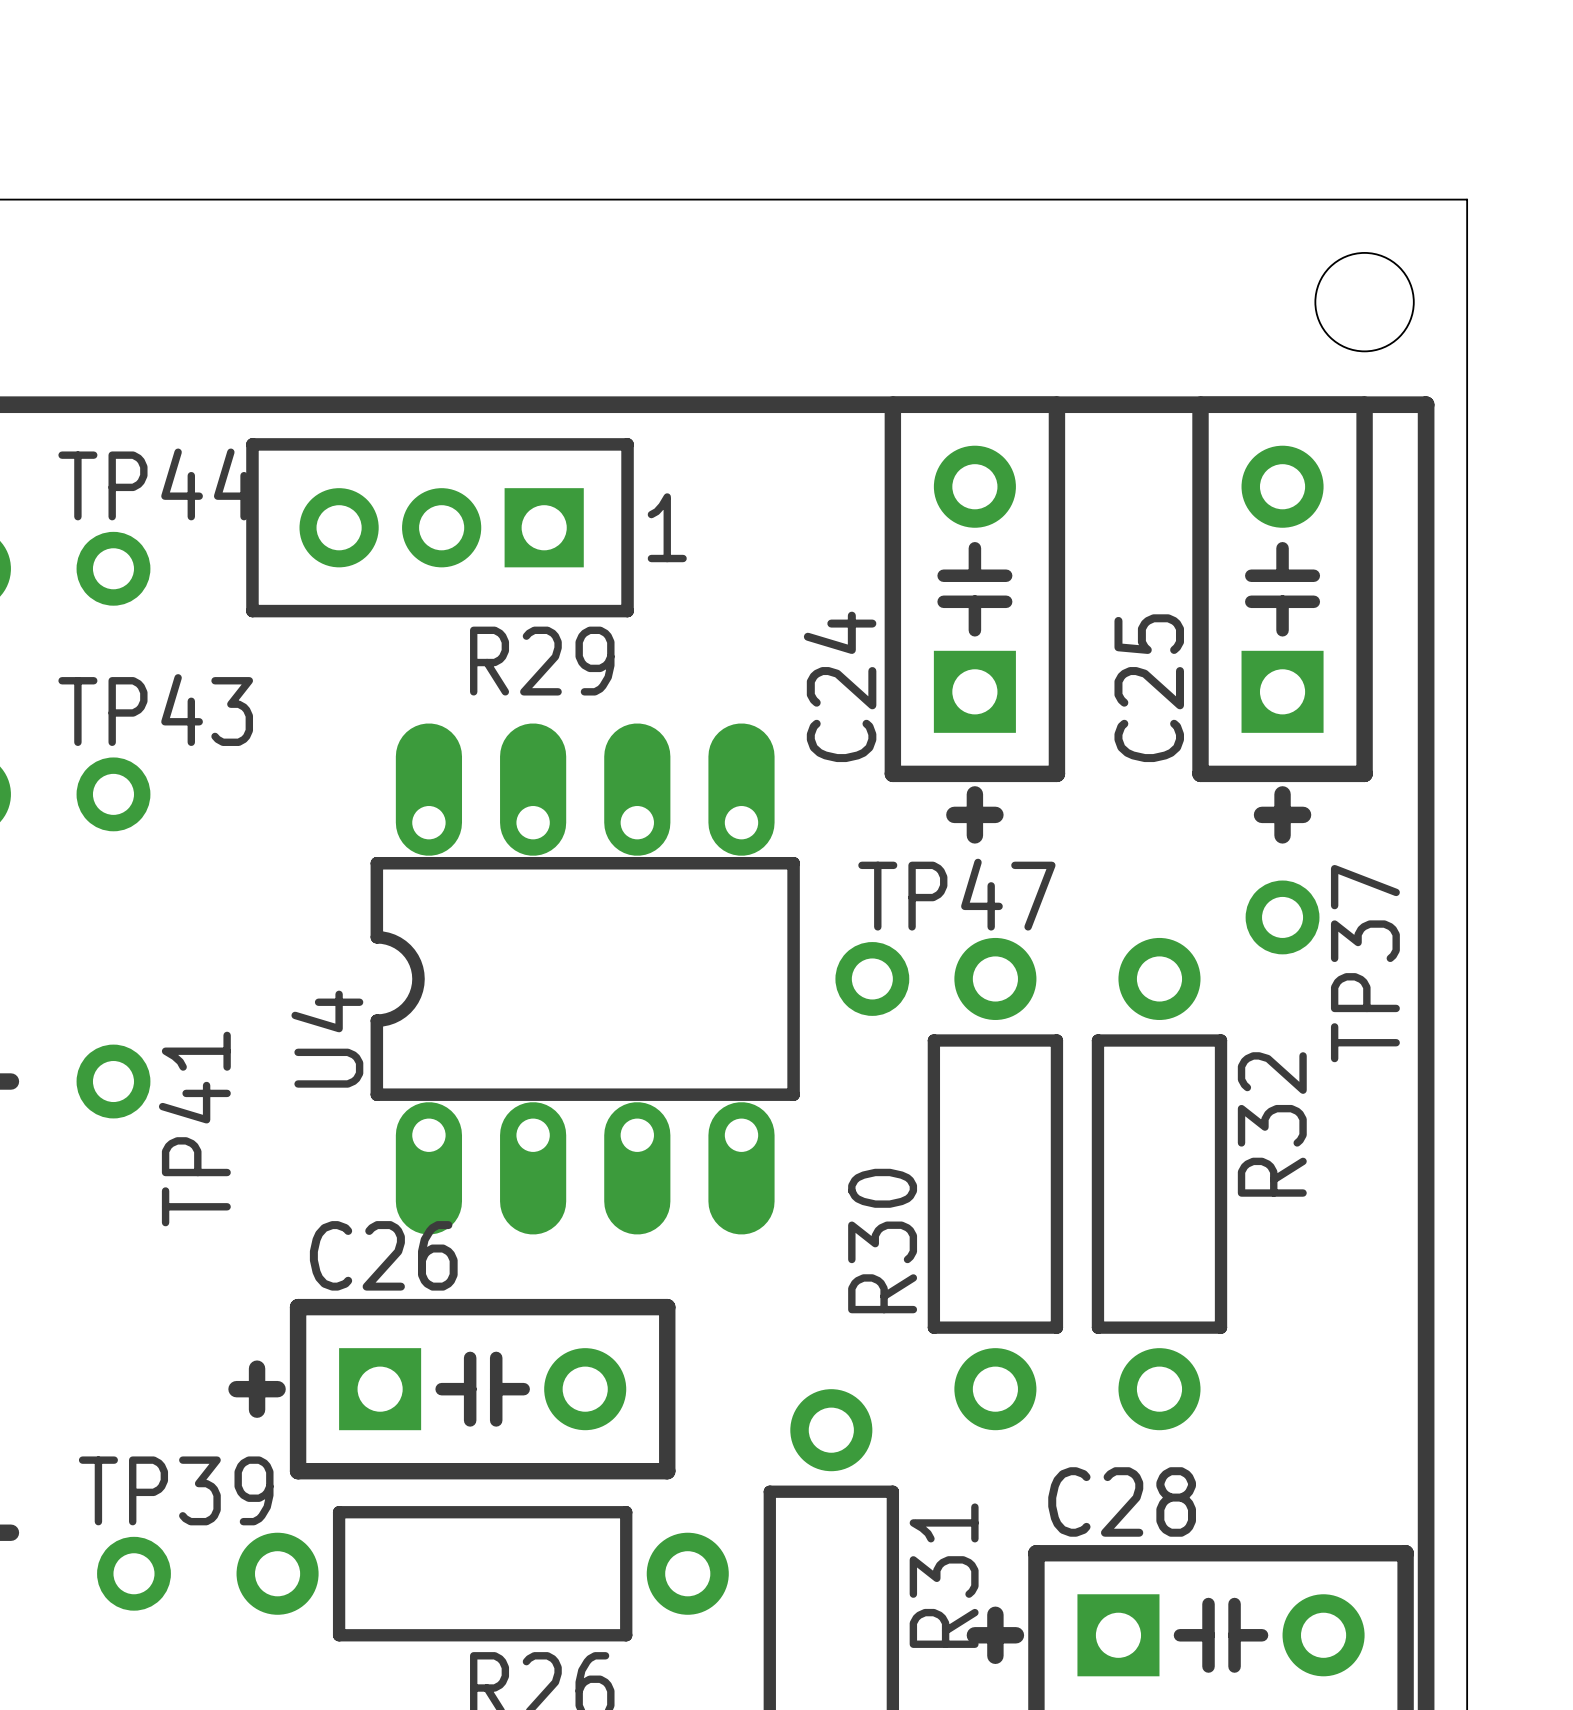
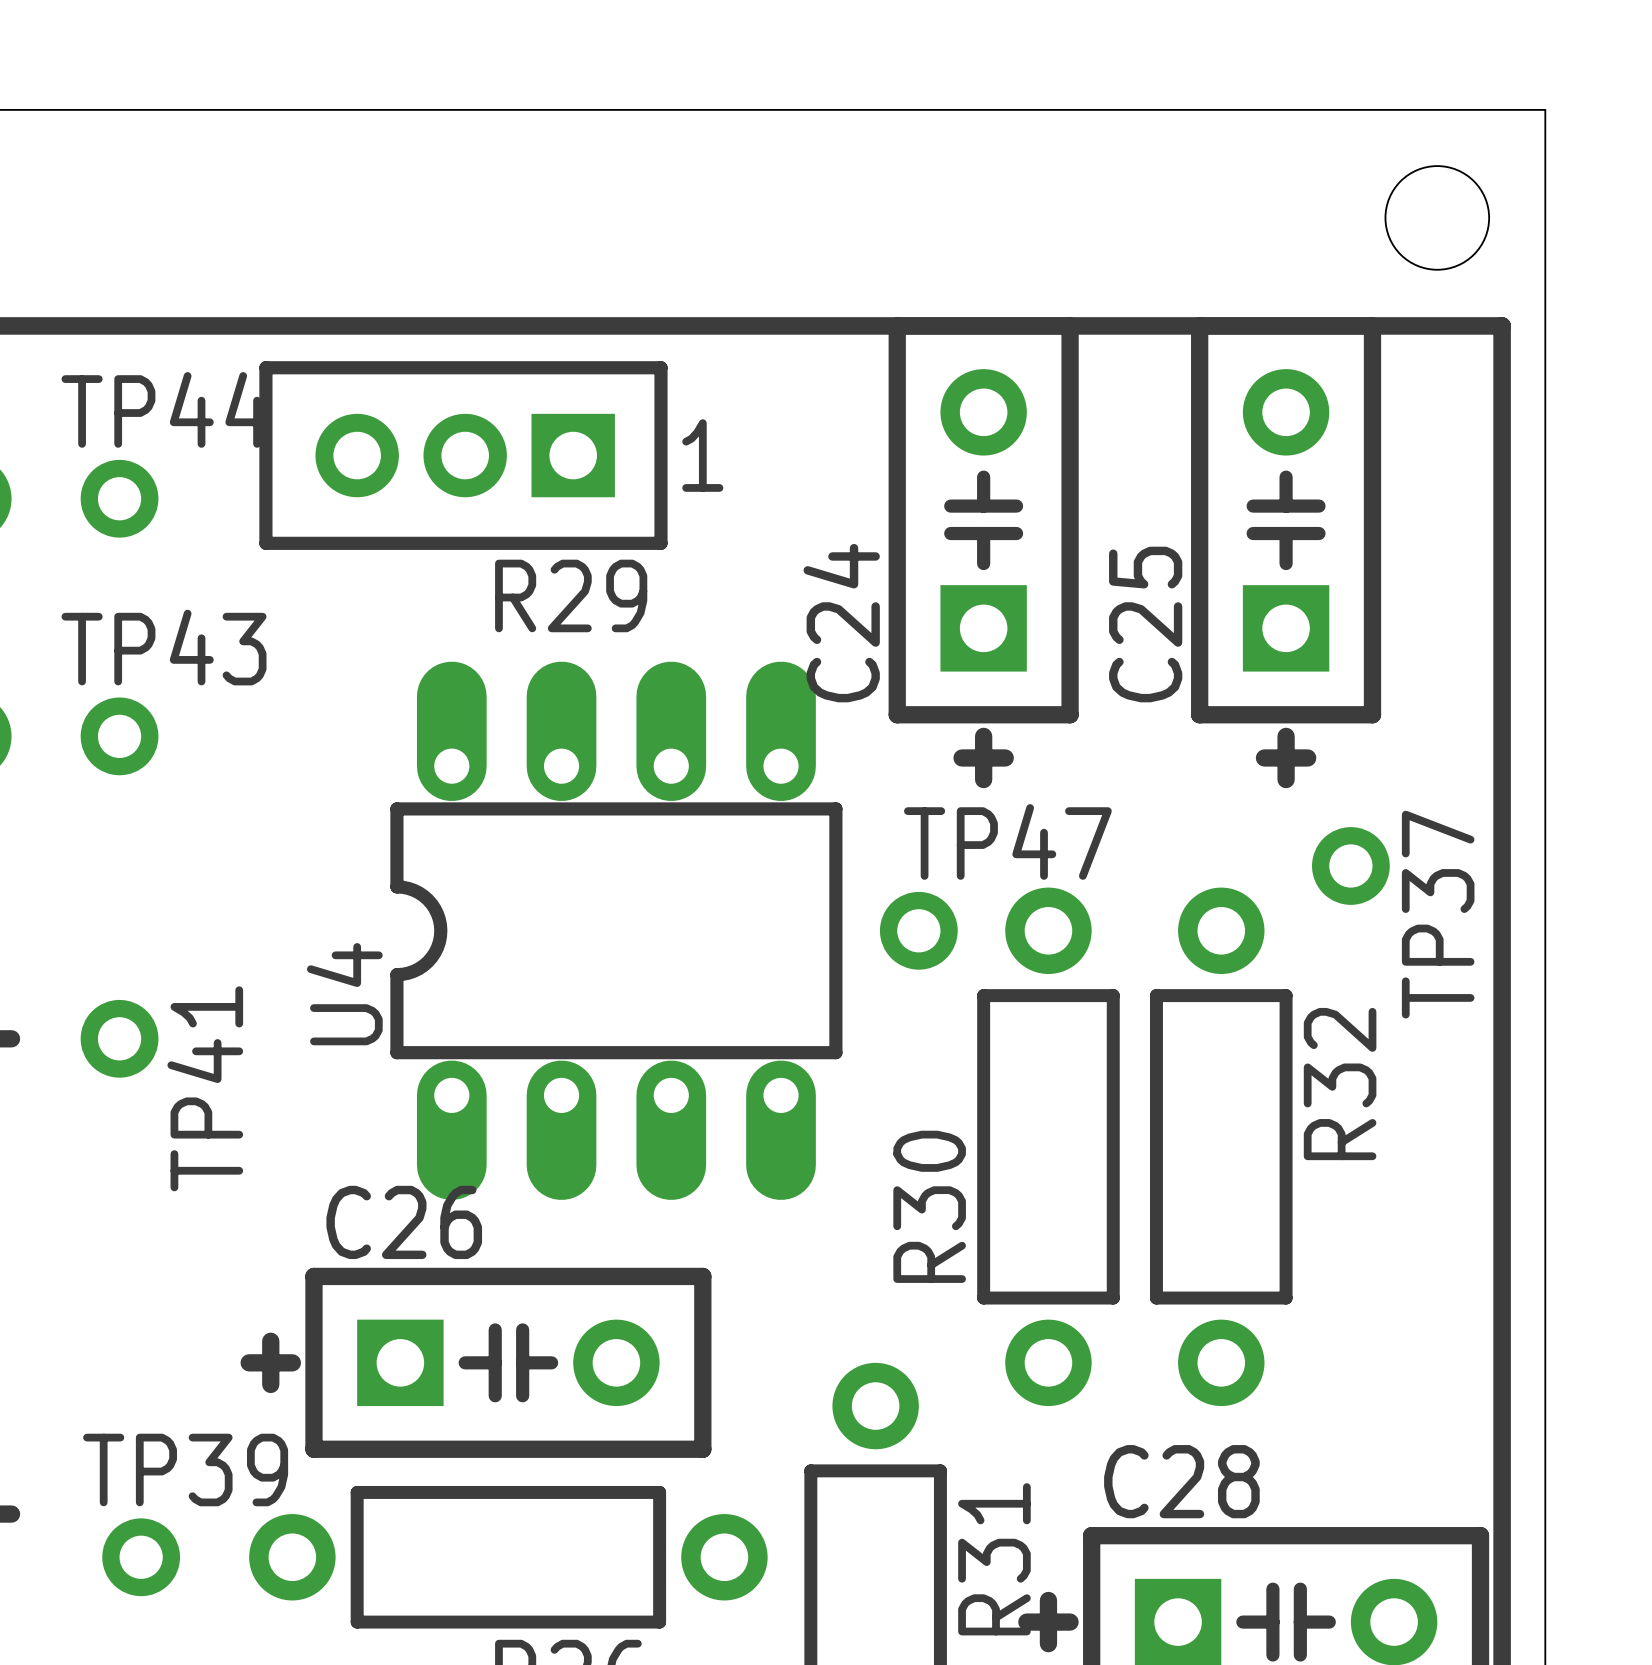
C24 position: (974, 620) -> (983, 552)
C25 position: (1282, 620) -> (1286, 552)

